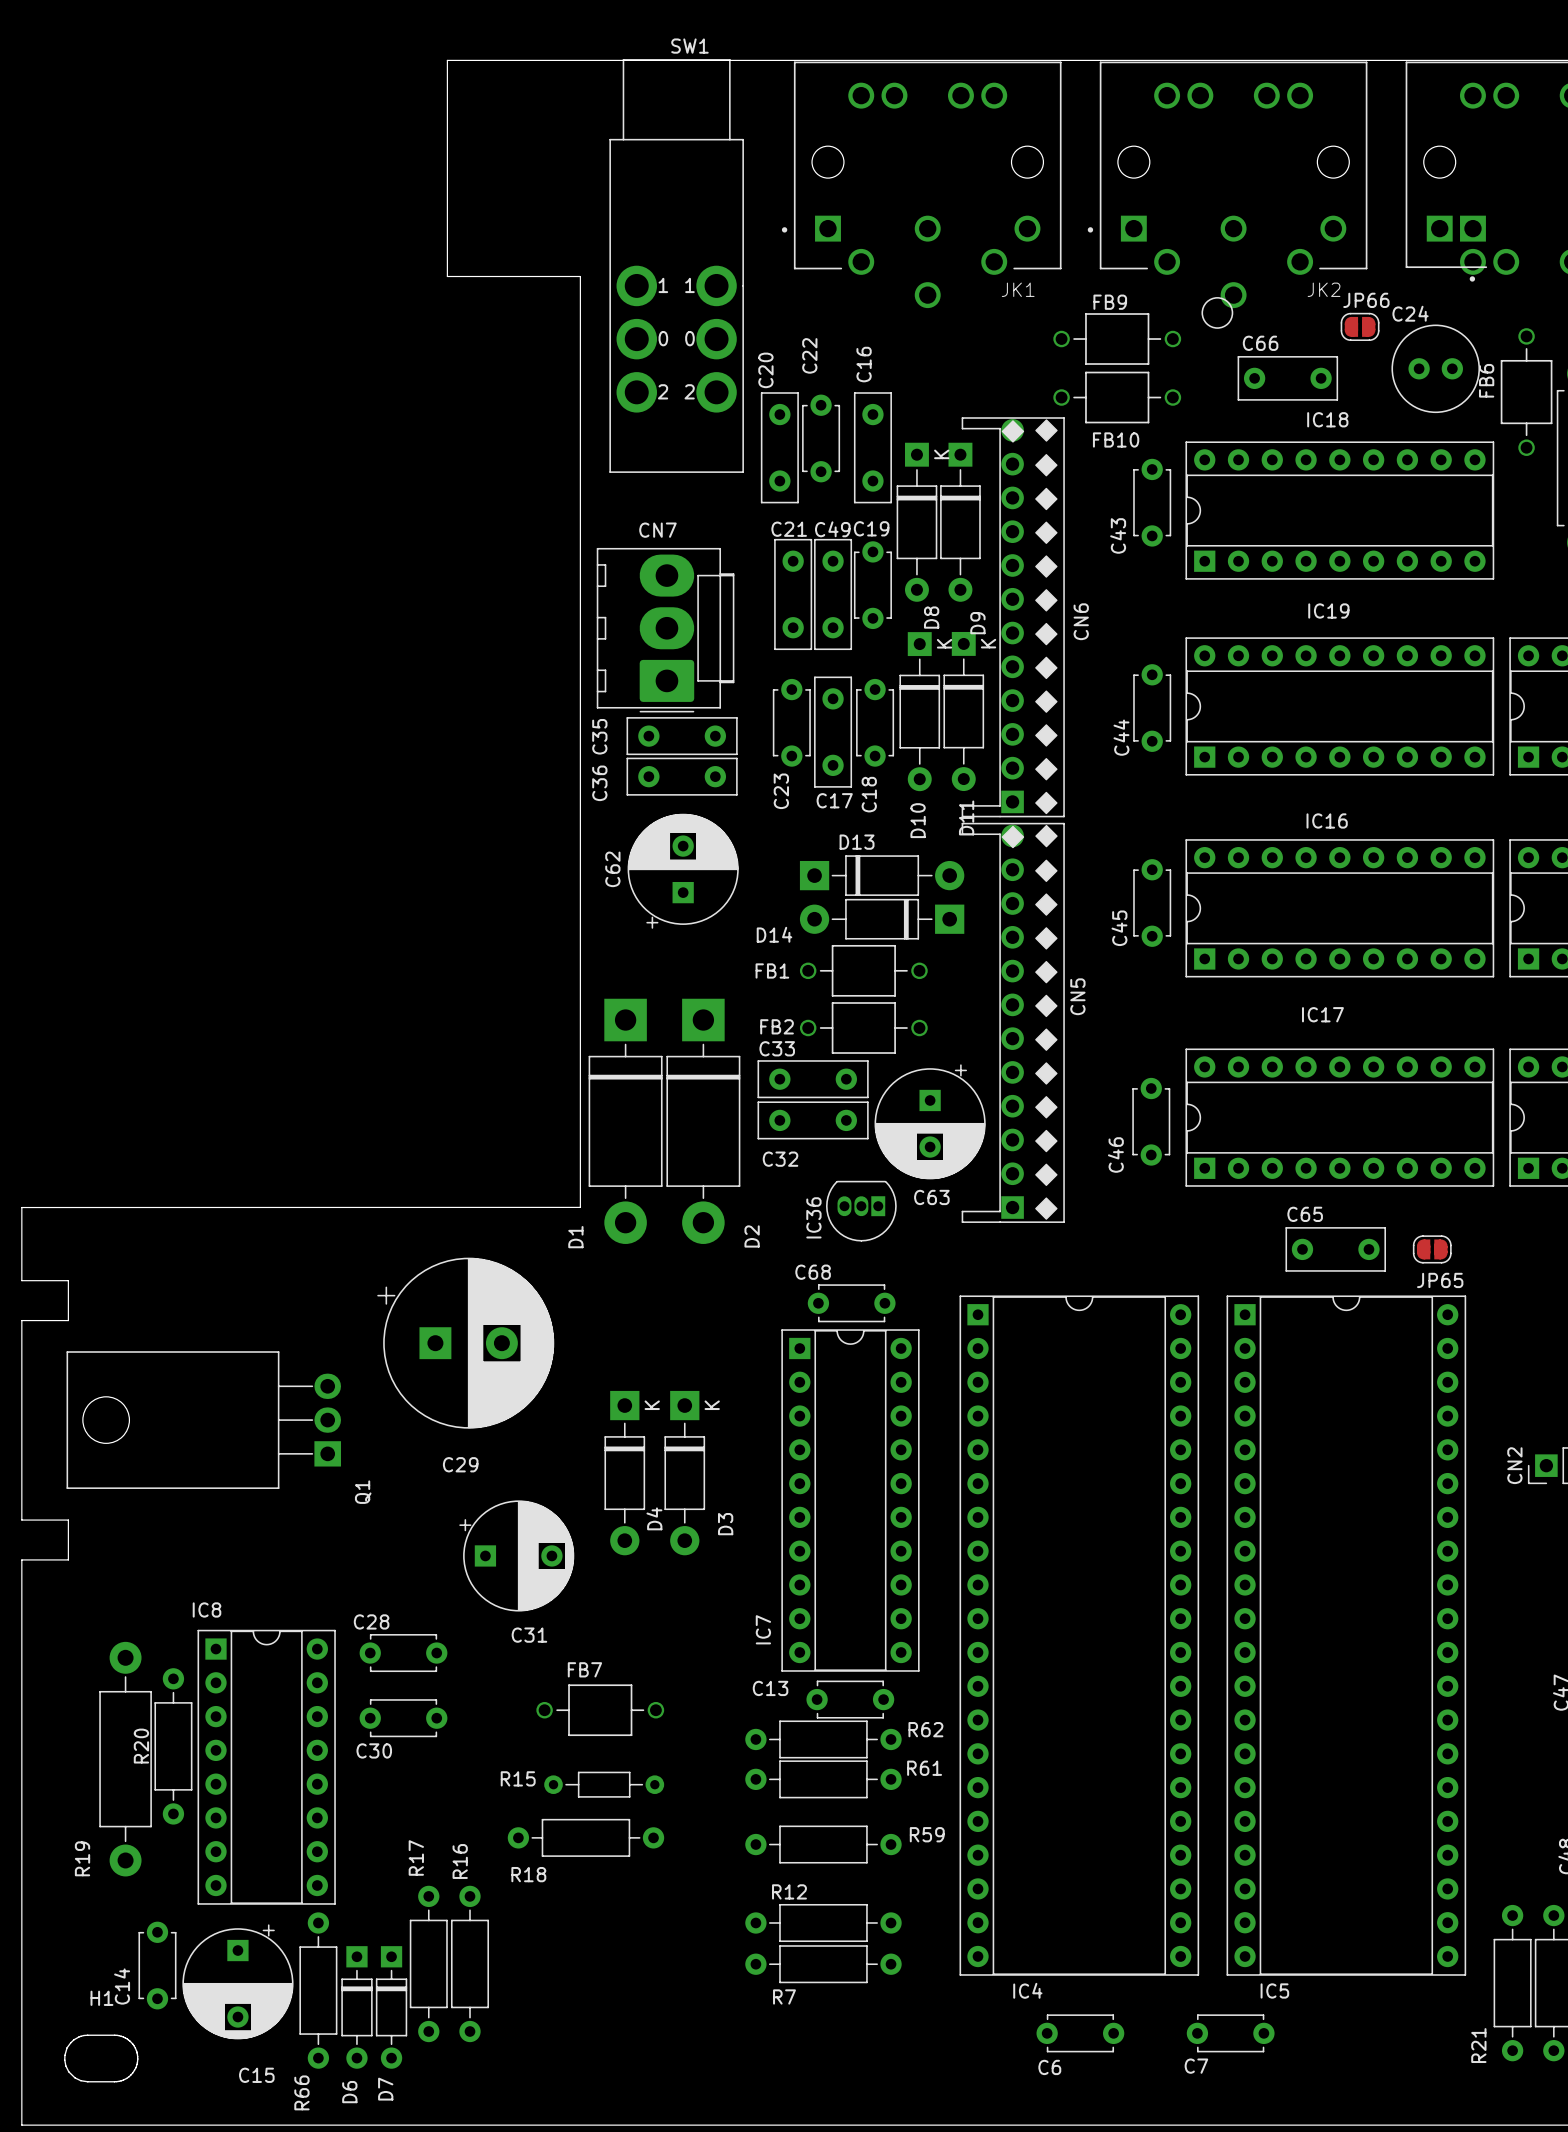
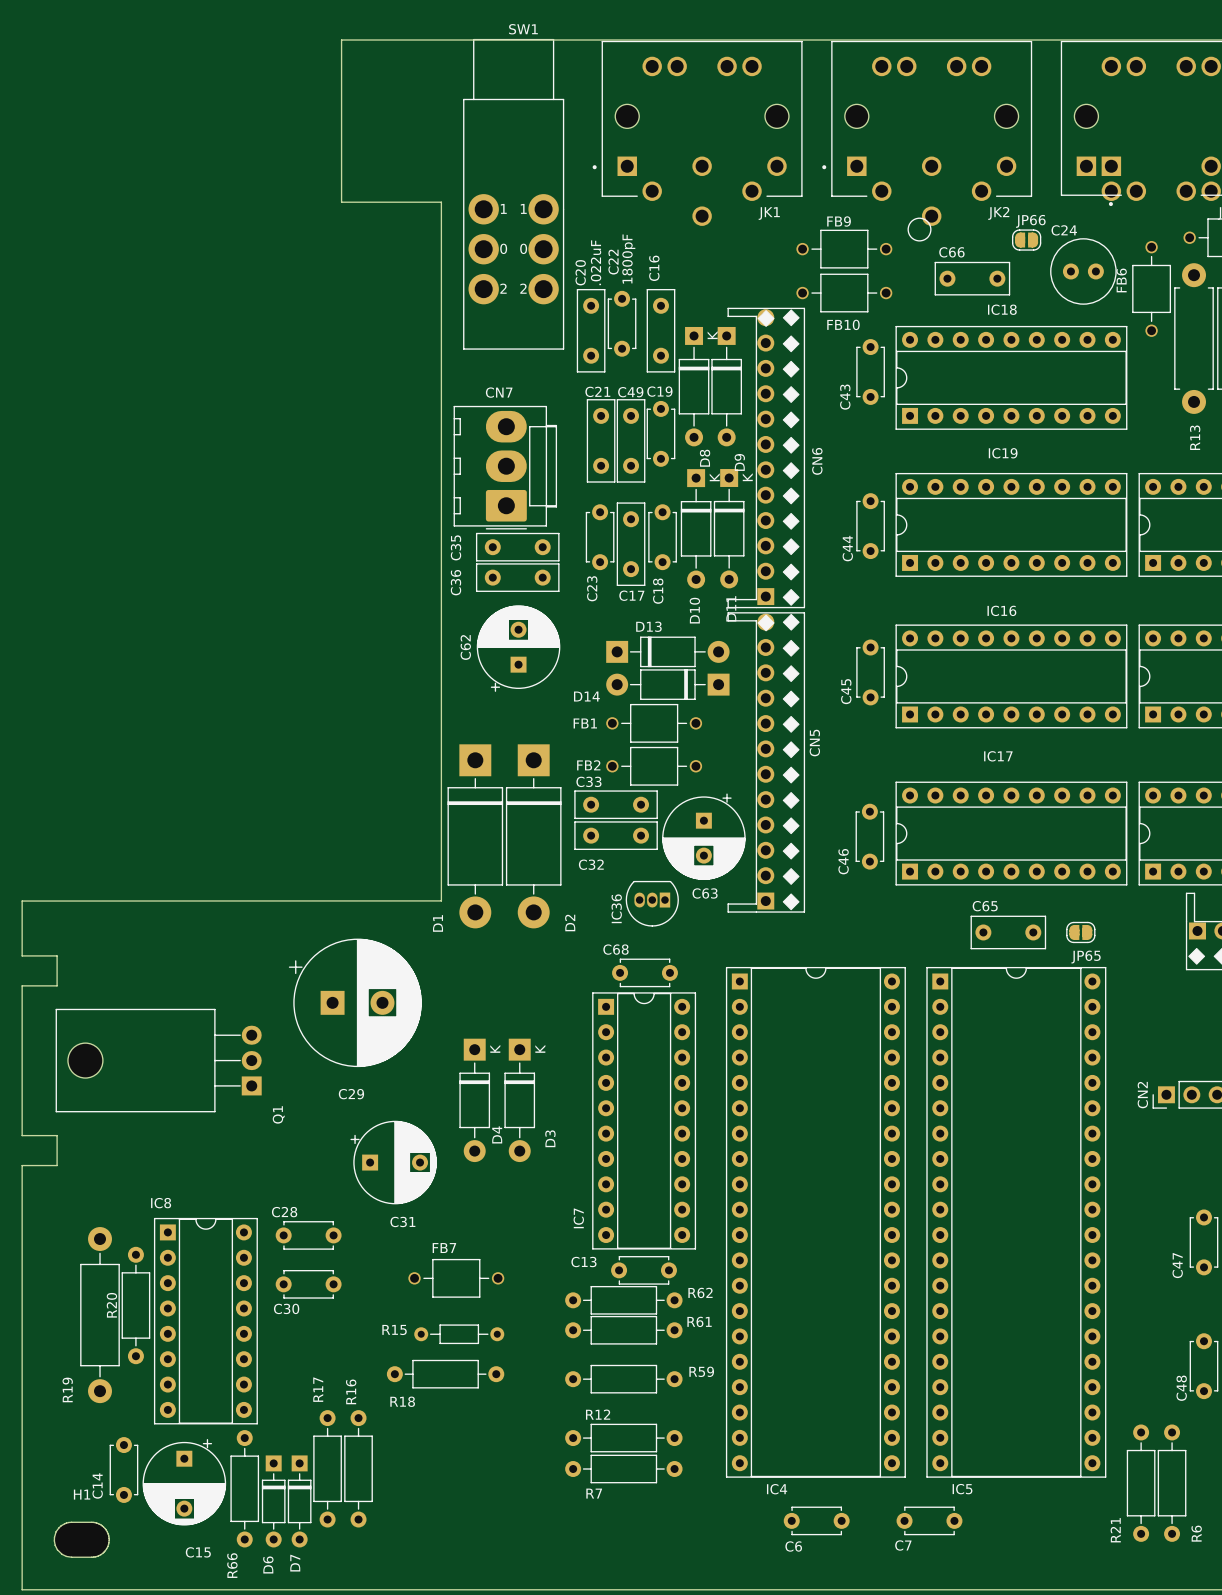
C22 value: none -> 1800pF (628, 259)
C20 value: none -> .022uF (596, 262)

